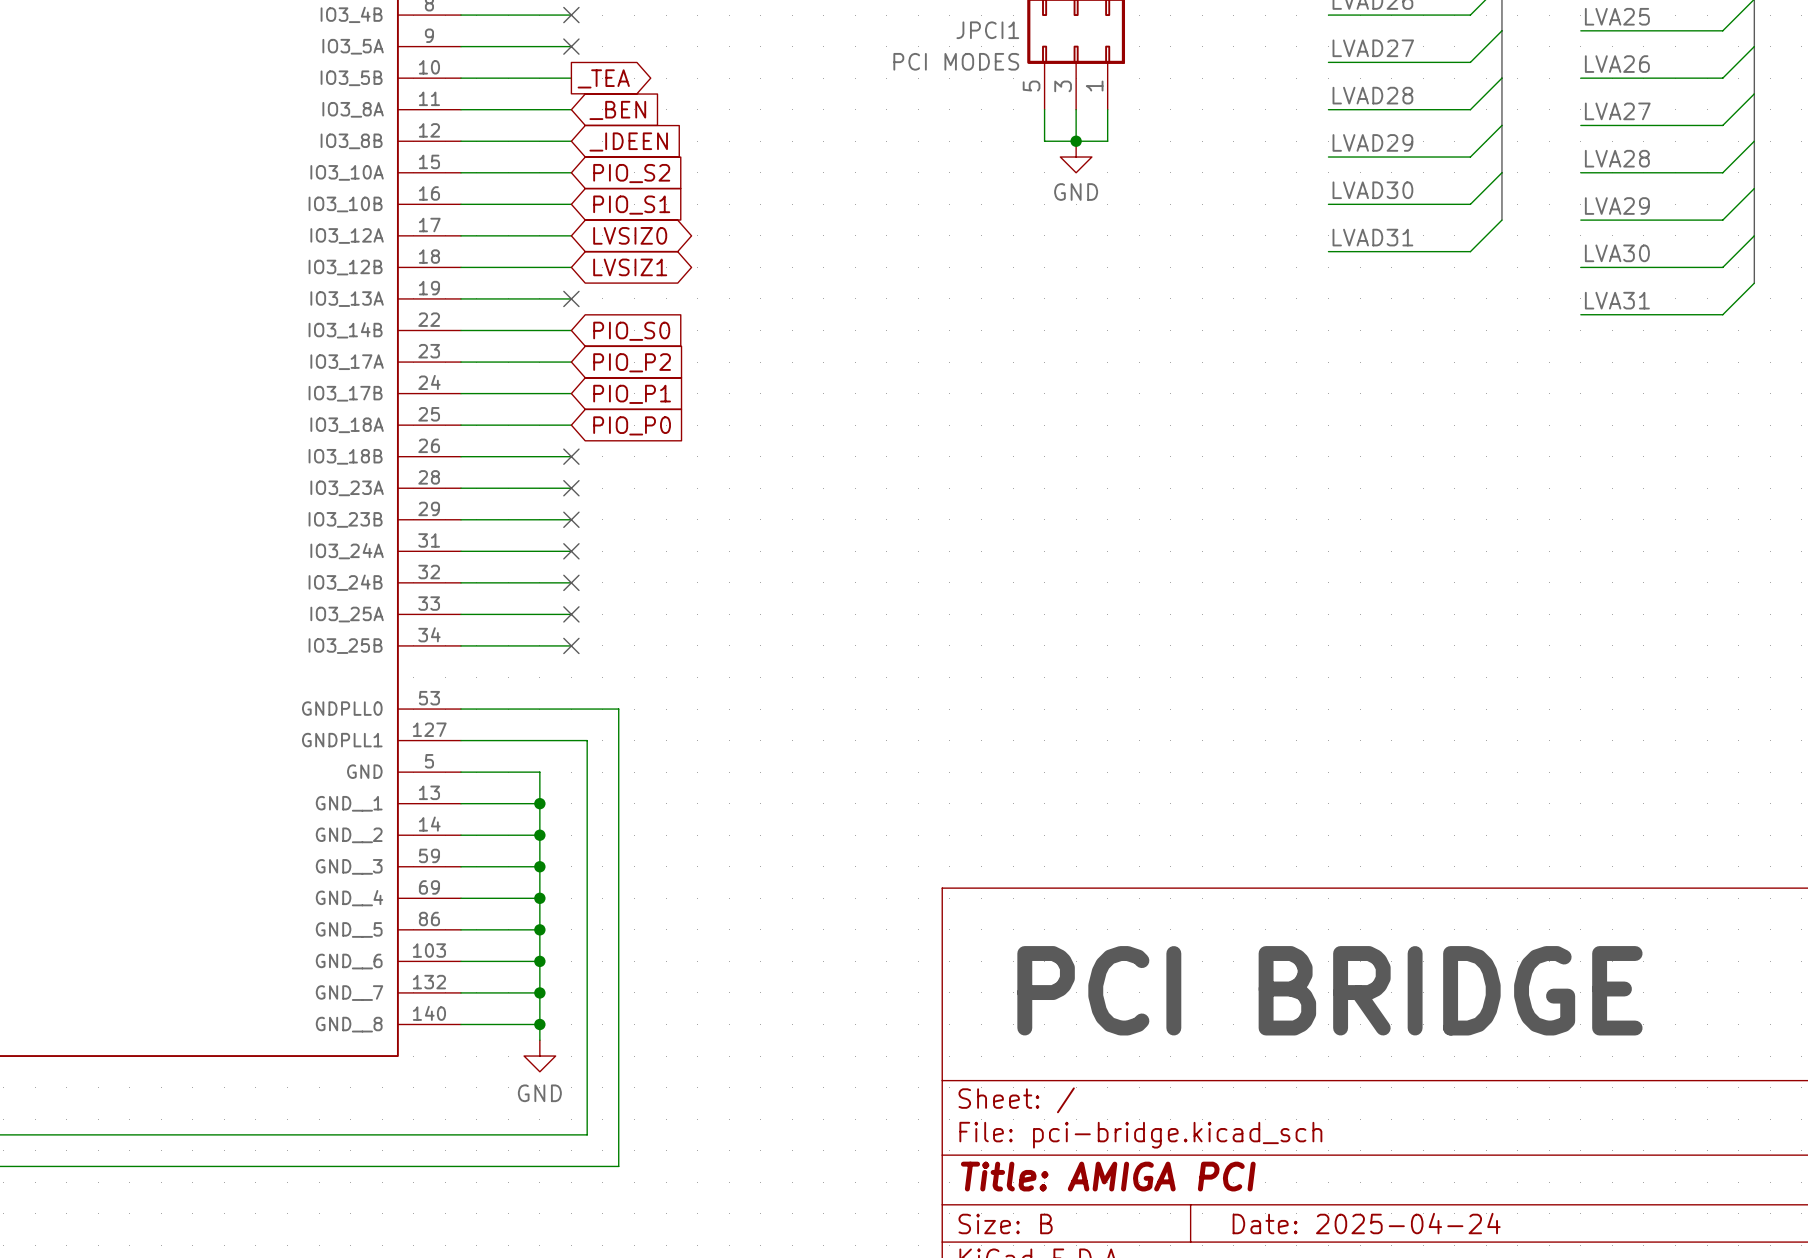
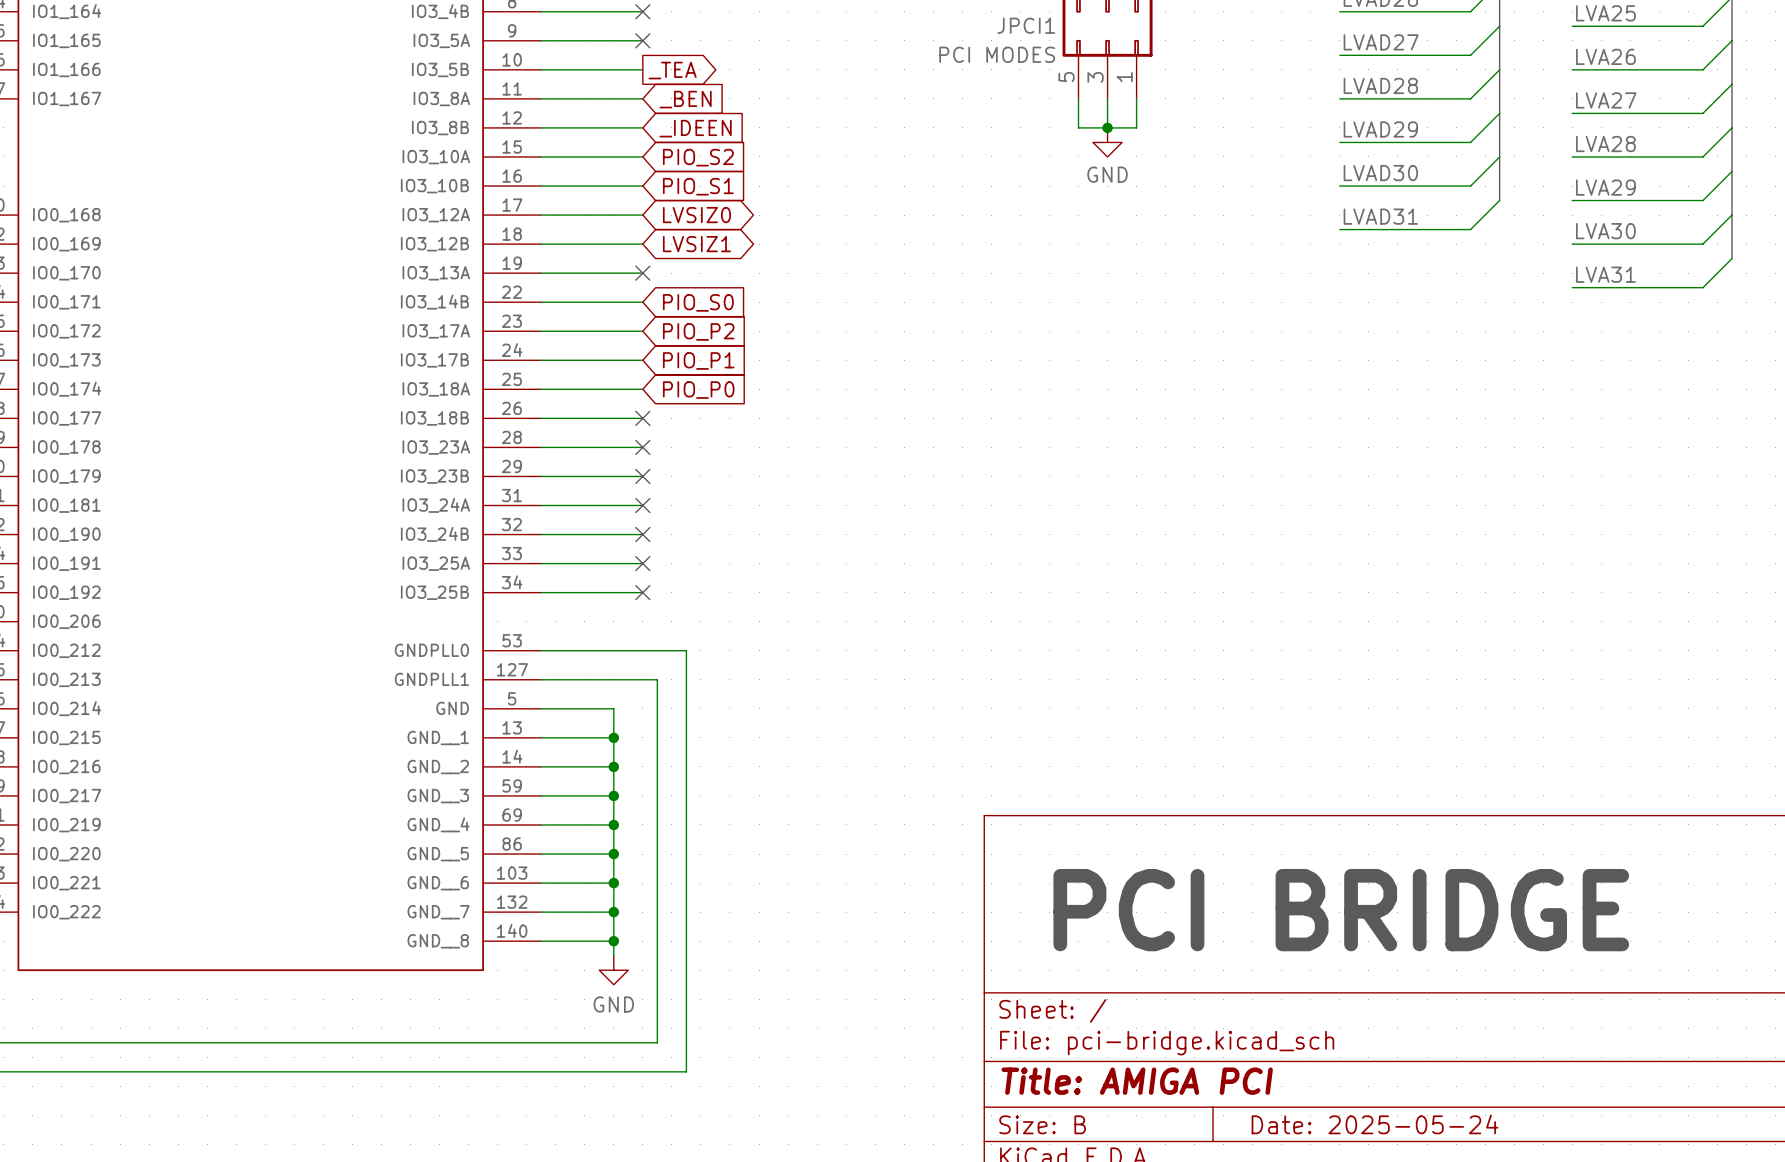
title block: Date: 2025-04-24 (1366, 1223) -> Date: 2025-05-24 (1375, 1124)

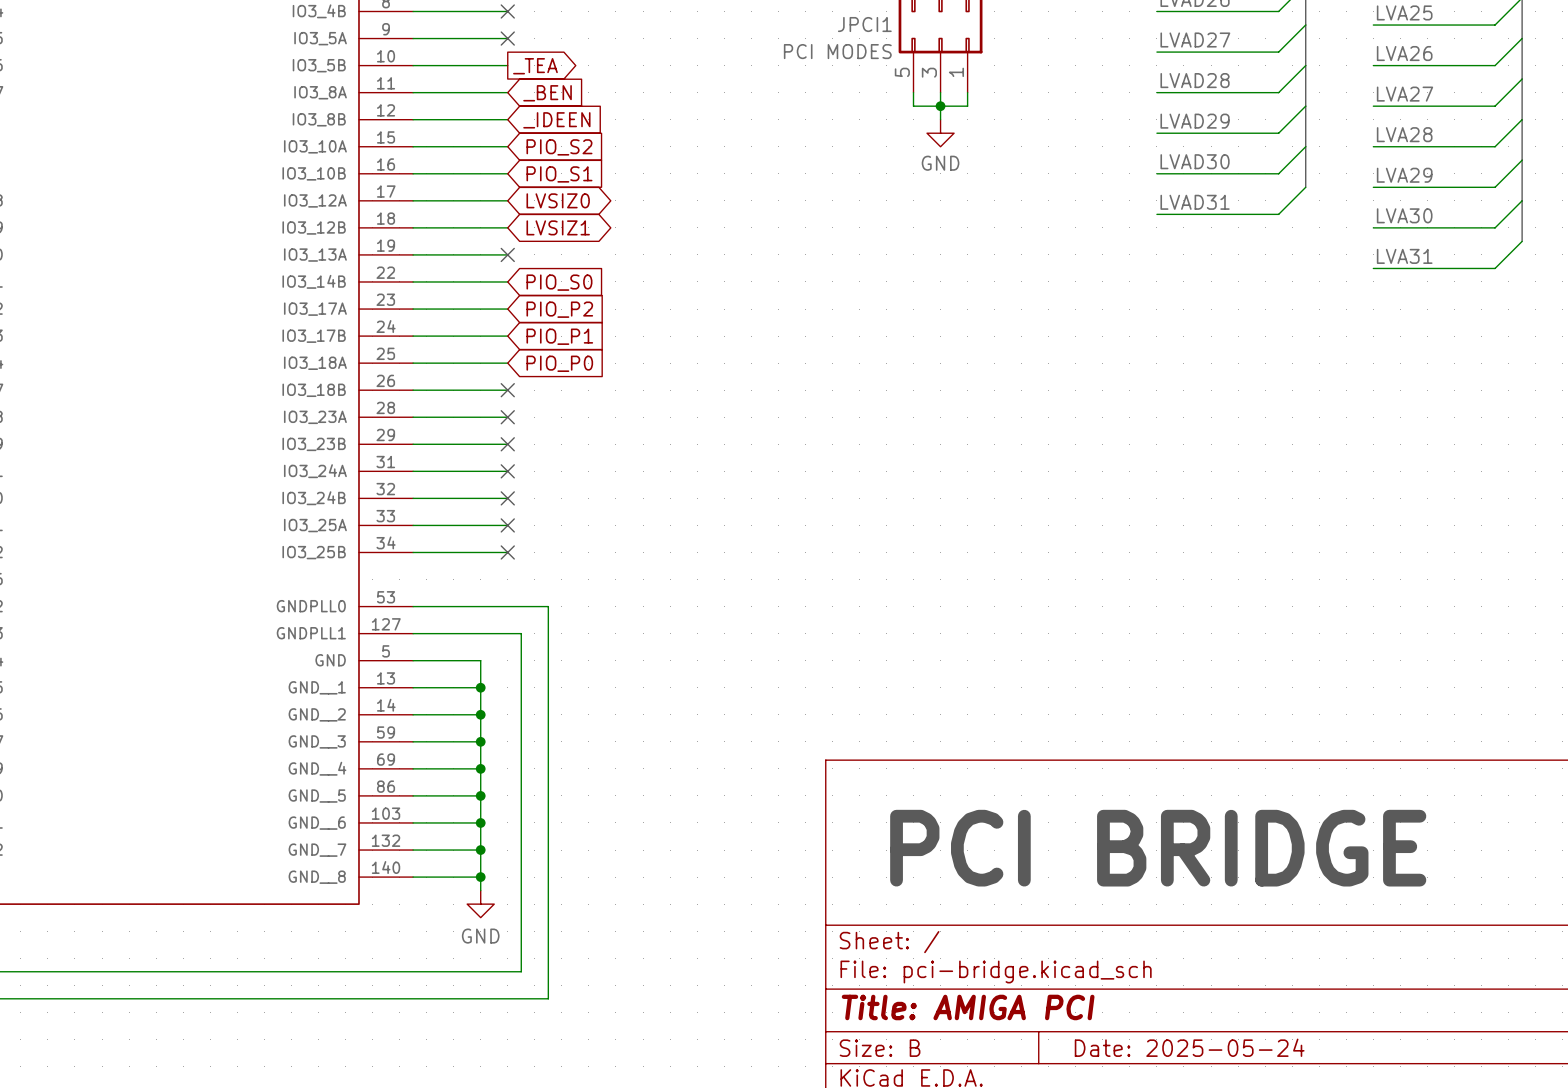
wire: (1078, 113) (1078, 127) (1136, 127) (1136, 113) -> (913, 106) (967, 106)
junction position: (1107, 127) -> (940, 106)

